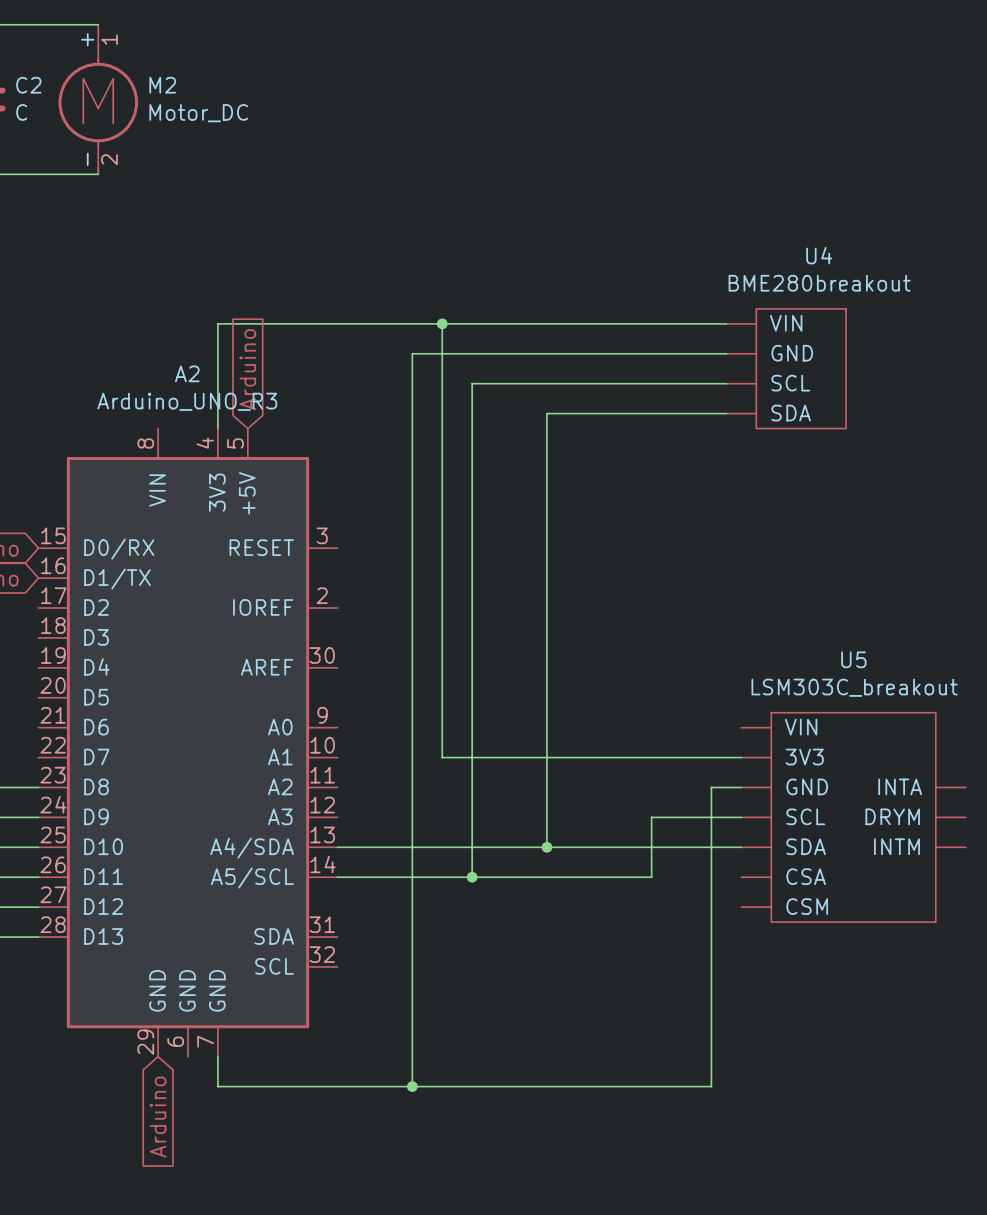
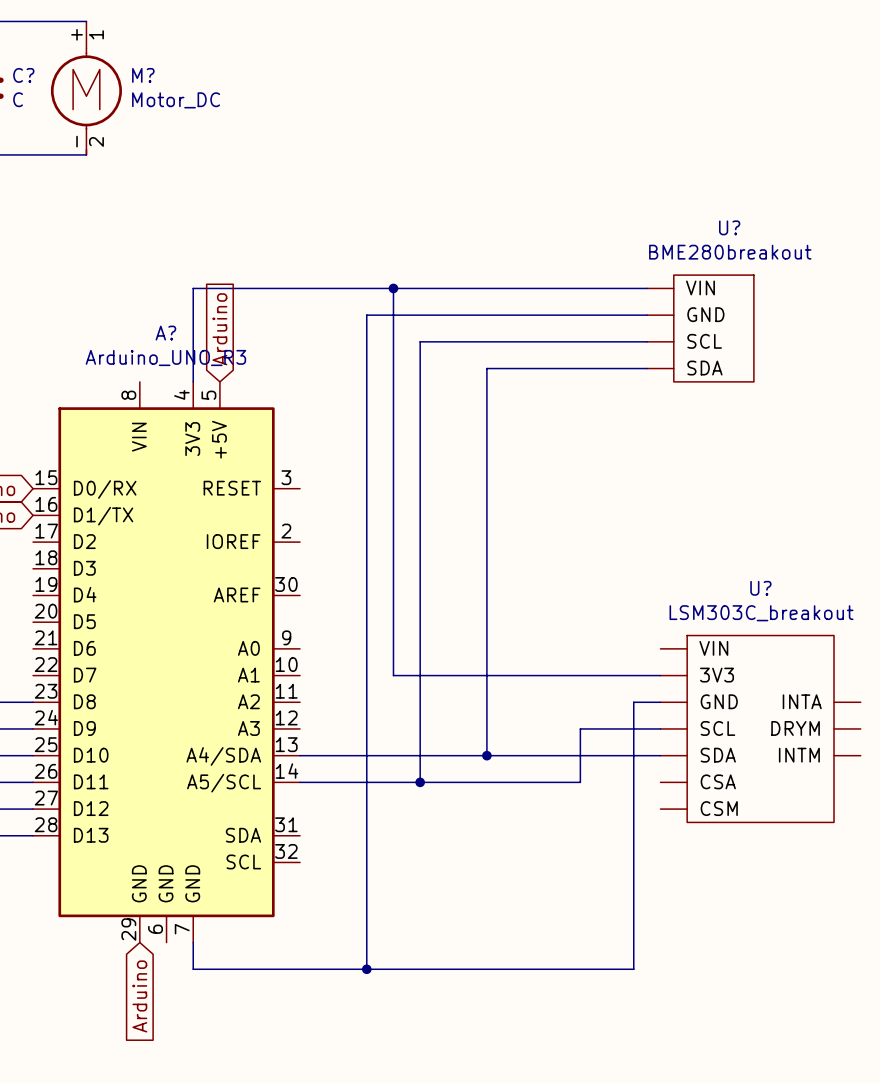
C2 name: C2 (28, 85) -> C? (23, 75)
M2 name: M2 (162, 85) -> M? (143, 75)
U4 name: U4 (819, 255) -> U? (729, 227)
A2 name: A2 (187, 373) -> A? (165, 333)
U5 name: U5 (853, 659) -> U? (760, 588)

